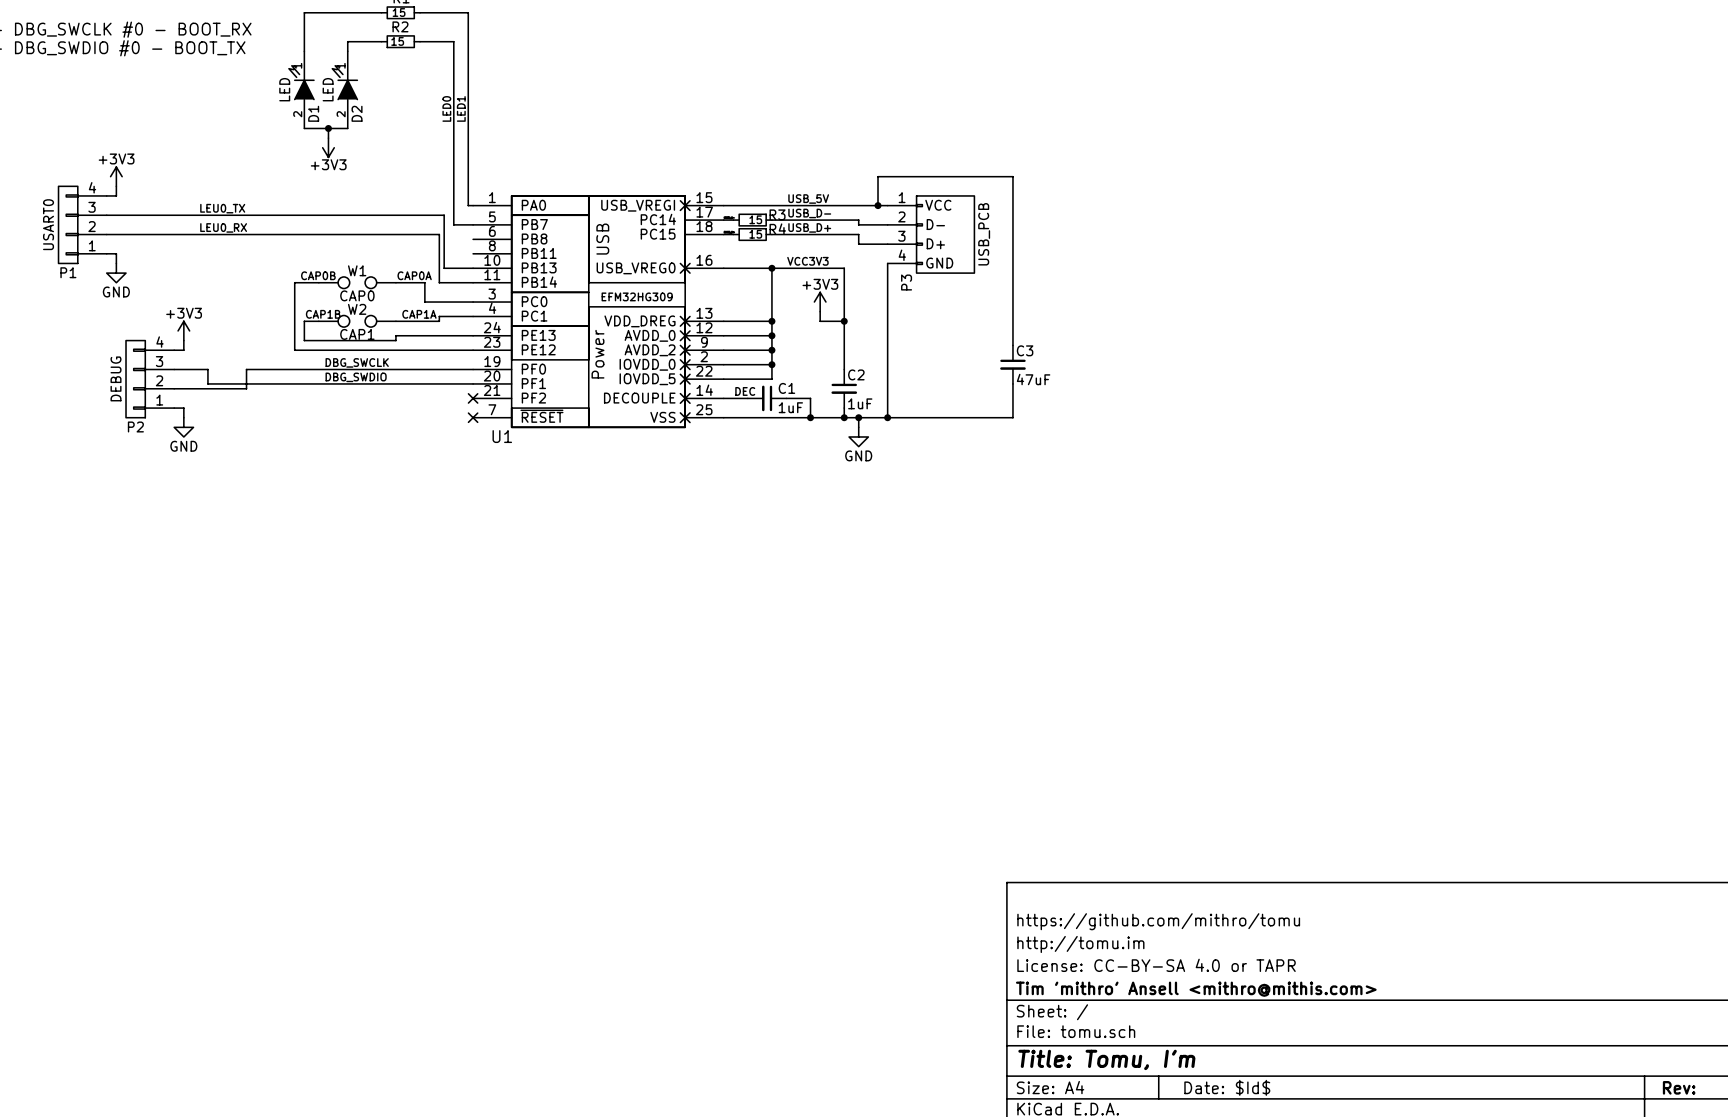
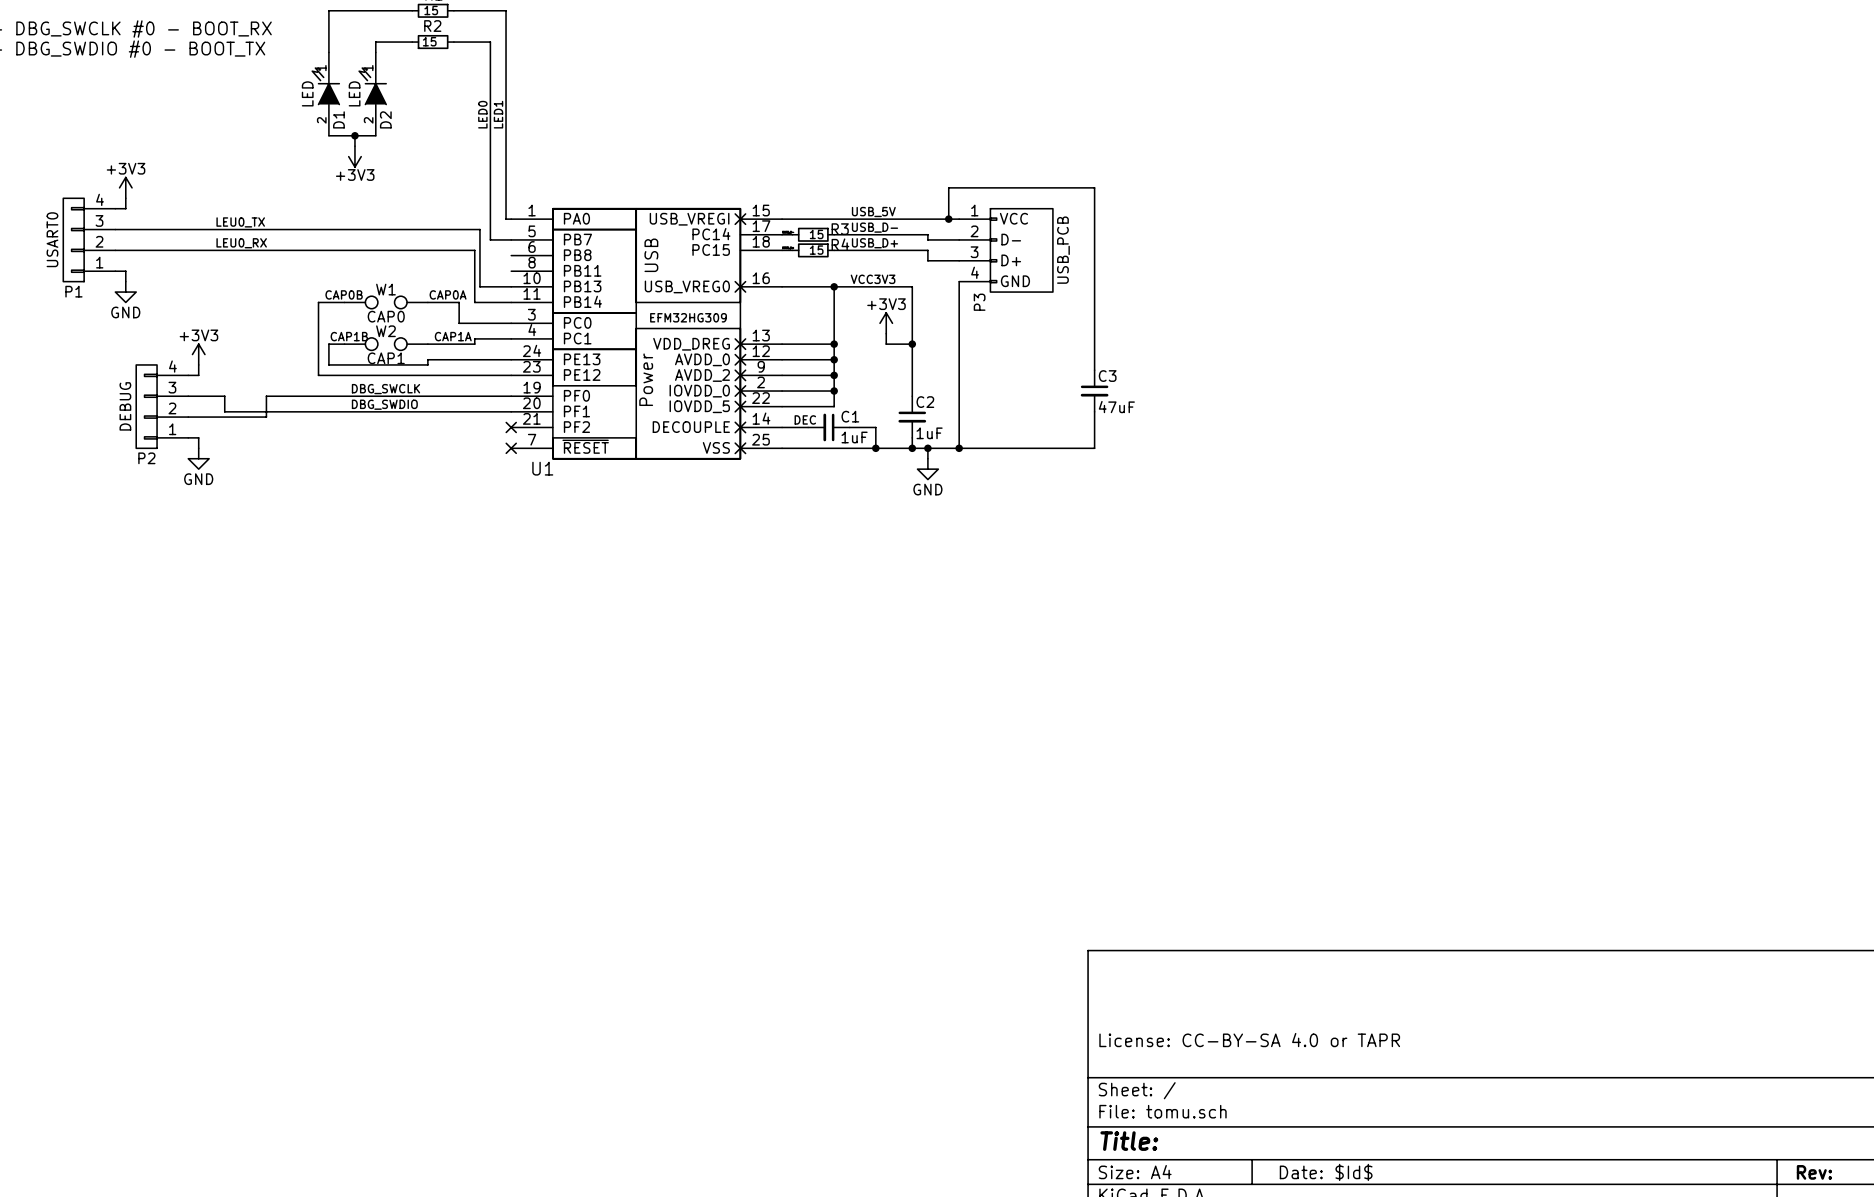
title block: https://github.com/mithro/tomu (1158, 921) -> none
title block: http://tomu.im (1080, 944) -> none
title block: Tim 'mithro' Ansell <mithro@mithis.com> (1196, 989) -> none
title block: Title: Tomu, I'm (1106, 1059) -> Title: (1129, 1141)

